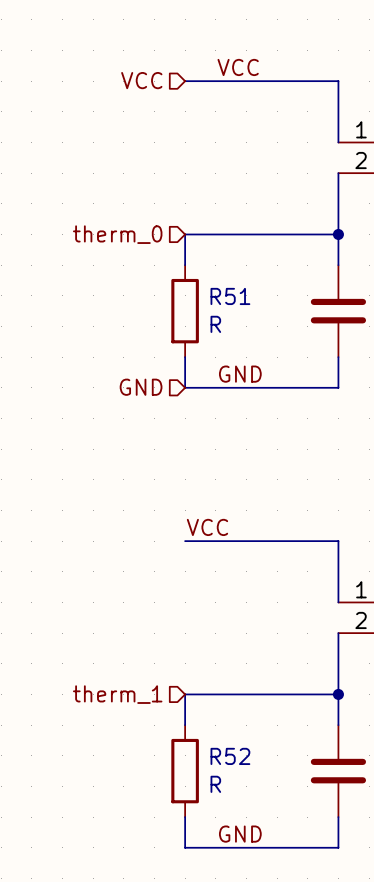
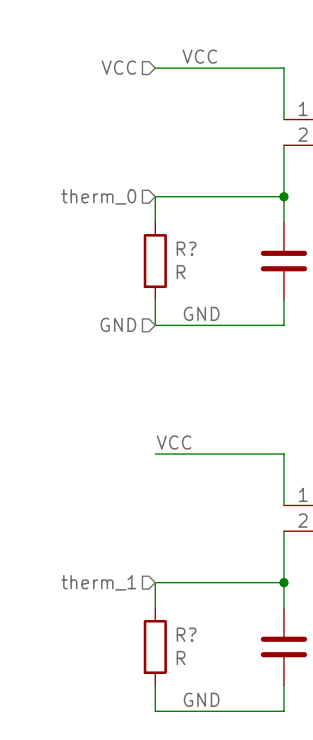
R51 name: R51 (230, 296) -> R? (186, 248)
R52 name: R52 (230, 756) -> R? (186, 634)

